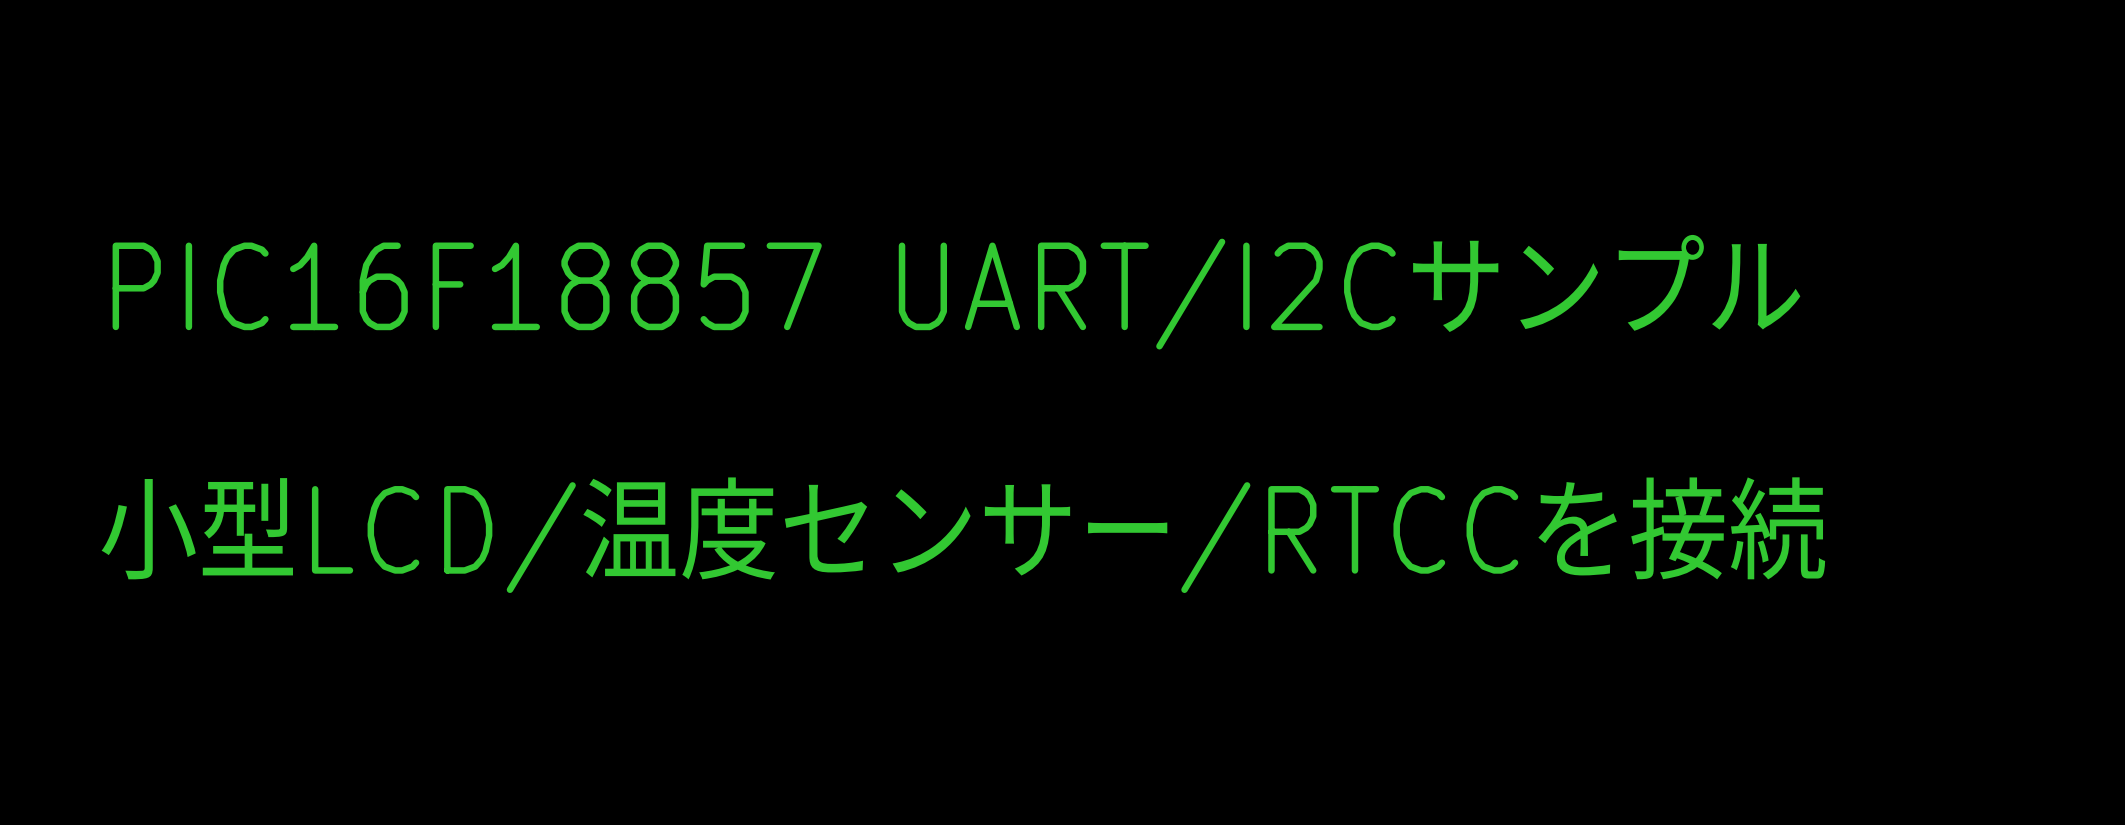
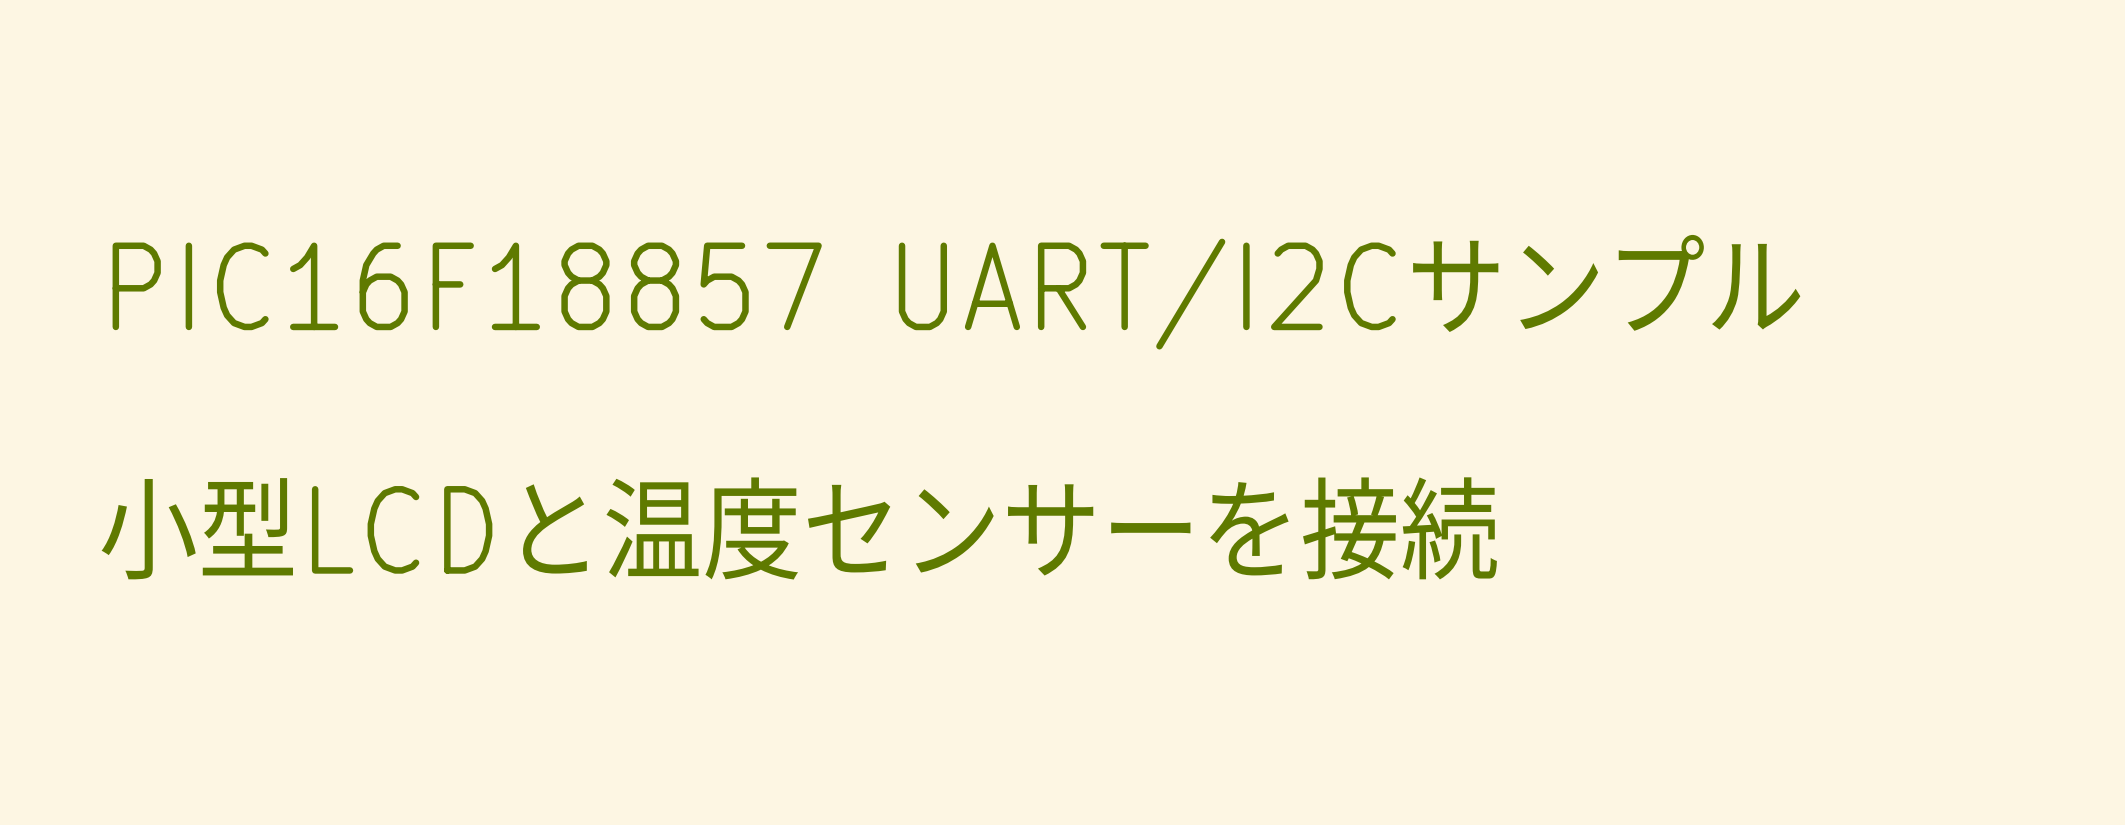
text: 小型LCD/温度センサー/RTCCを接続 (963, 533) -> 小型LCDと温度センサーを接続 (799, 528)

